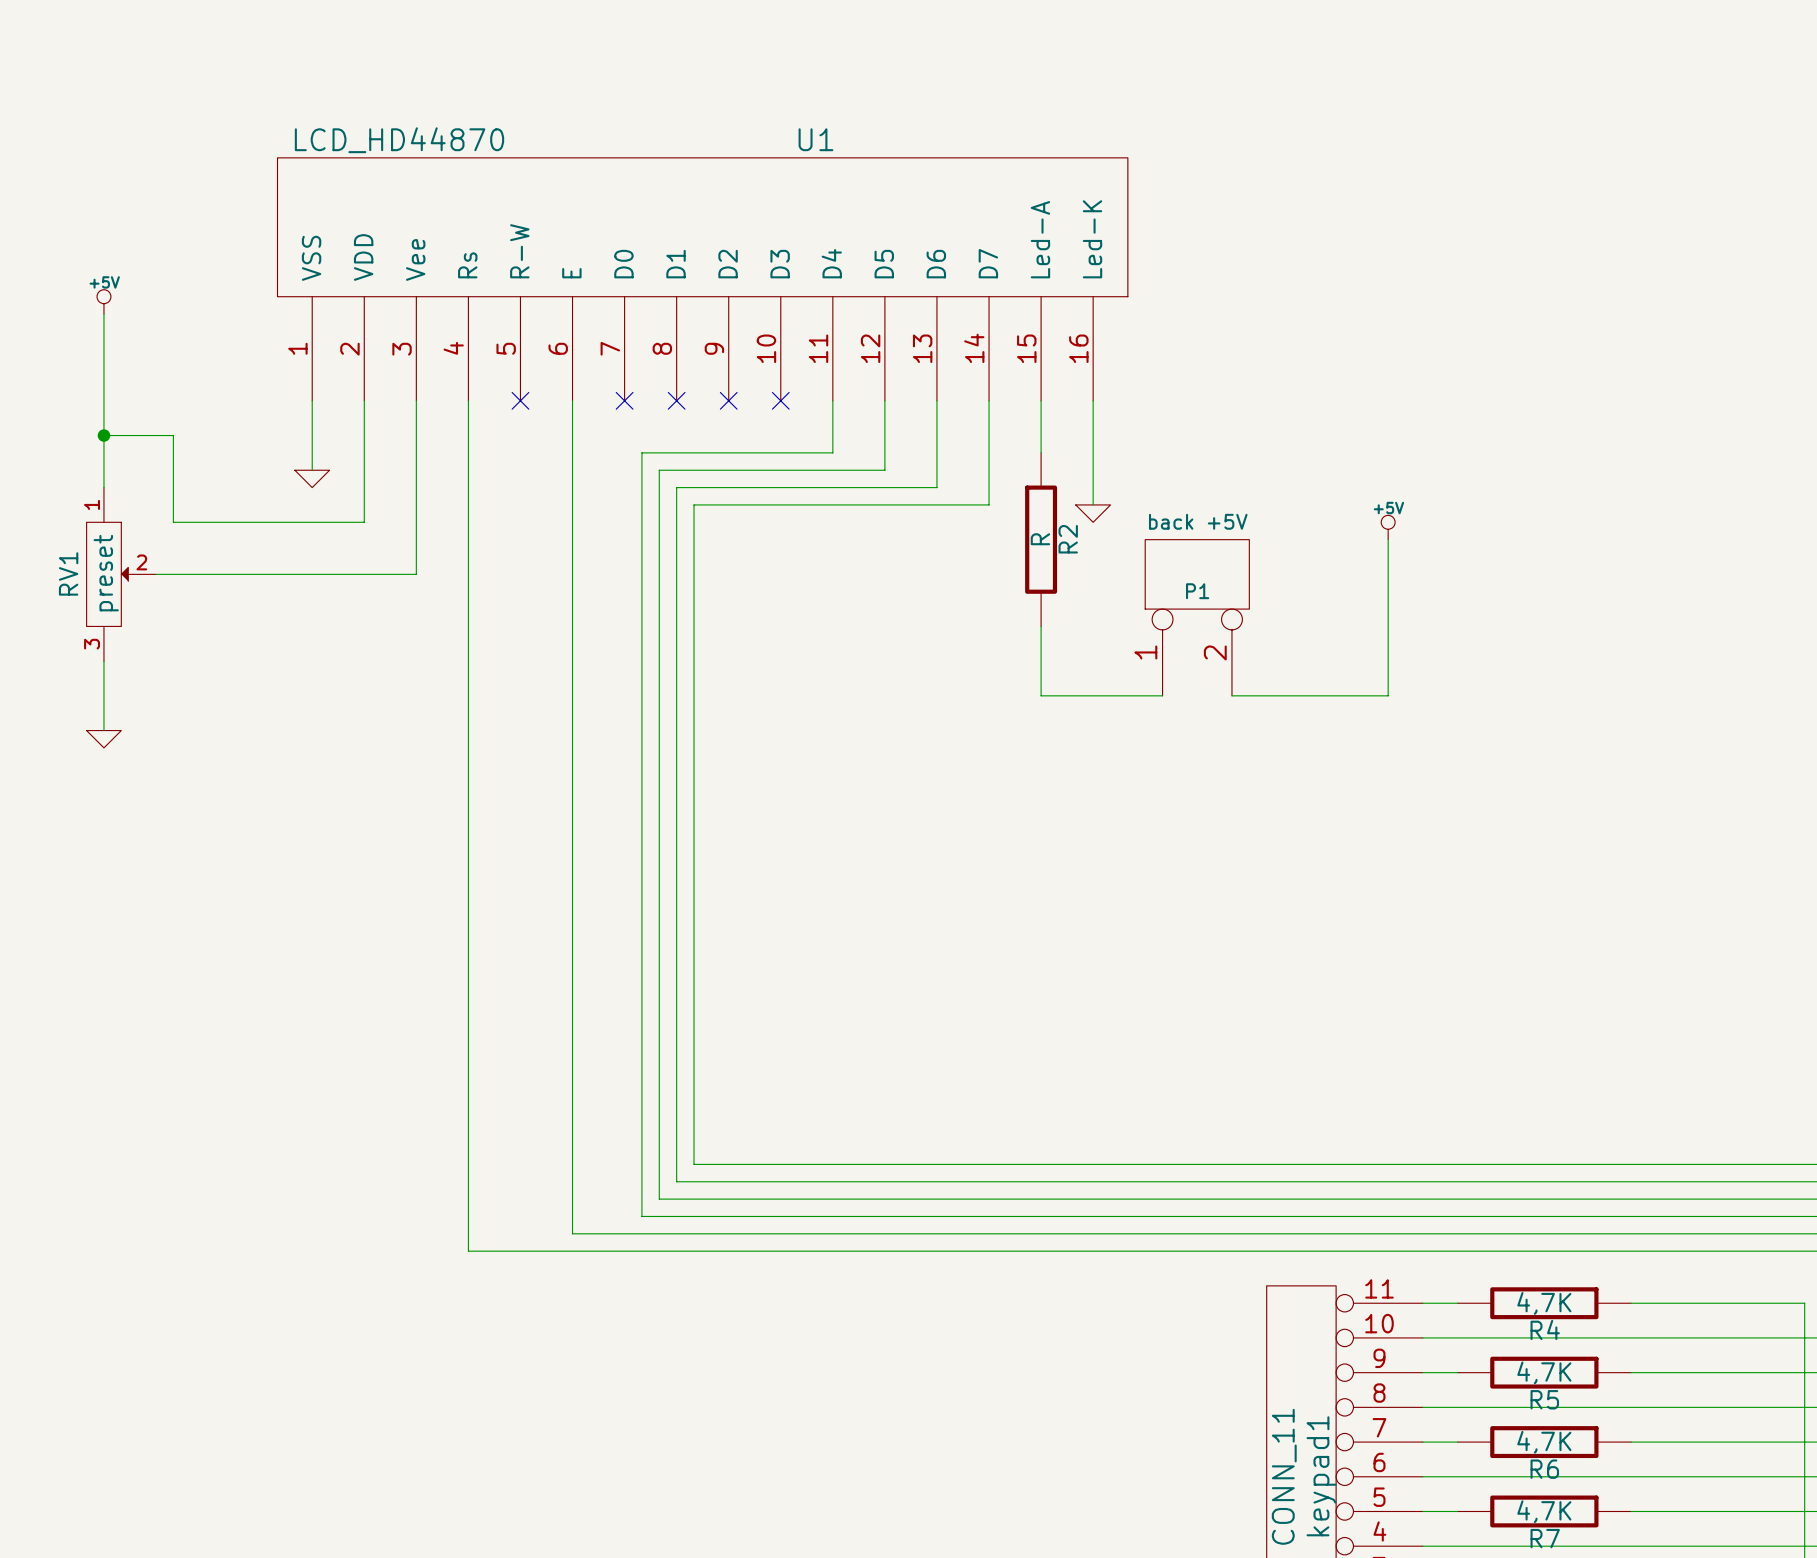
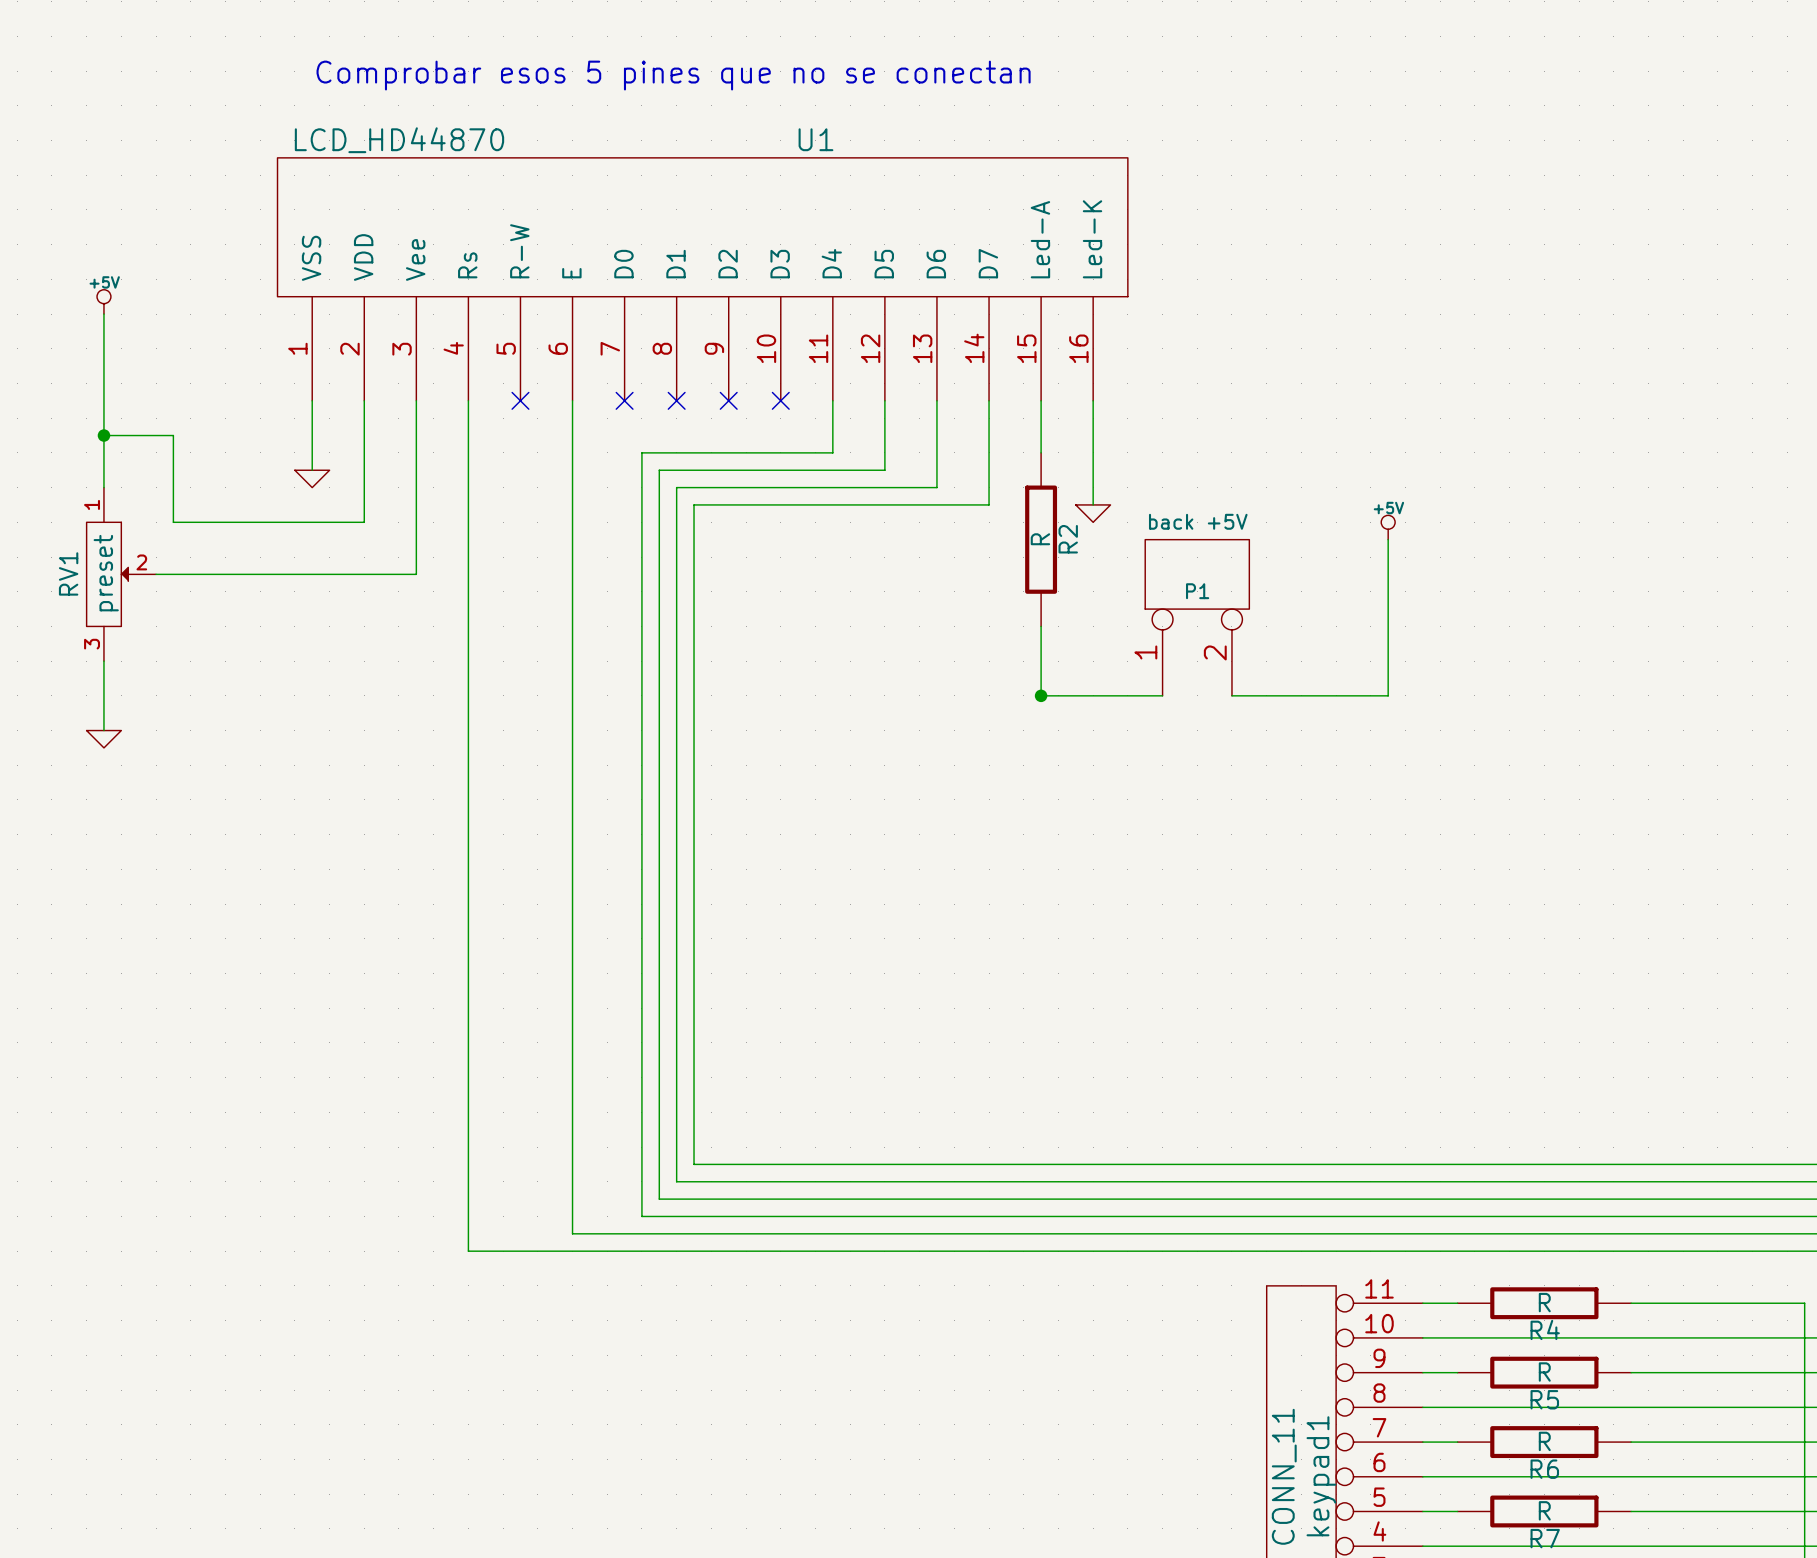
text: none -> Comprobar esos 5 pines que no se conectan (673, 75)
junction: none -> (1041, 695)
R4 value: 4,7K (1544, 1303) -> R (1544, 1302)
R5 value: 4,7K (1544, 1372) -> R (1544, 1372)
R6 value: 4,7K (1544, 1442) -> R (1544, 1441)
R7 value: 4,7K (1544, 1511) -> R (1544, 1510)

